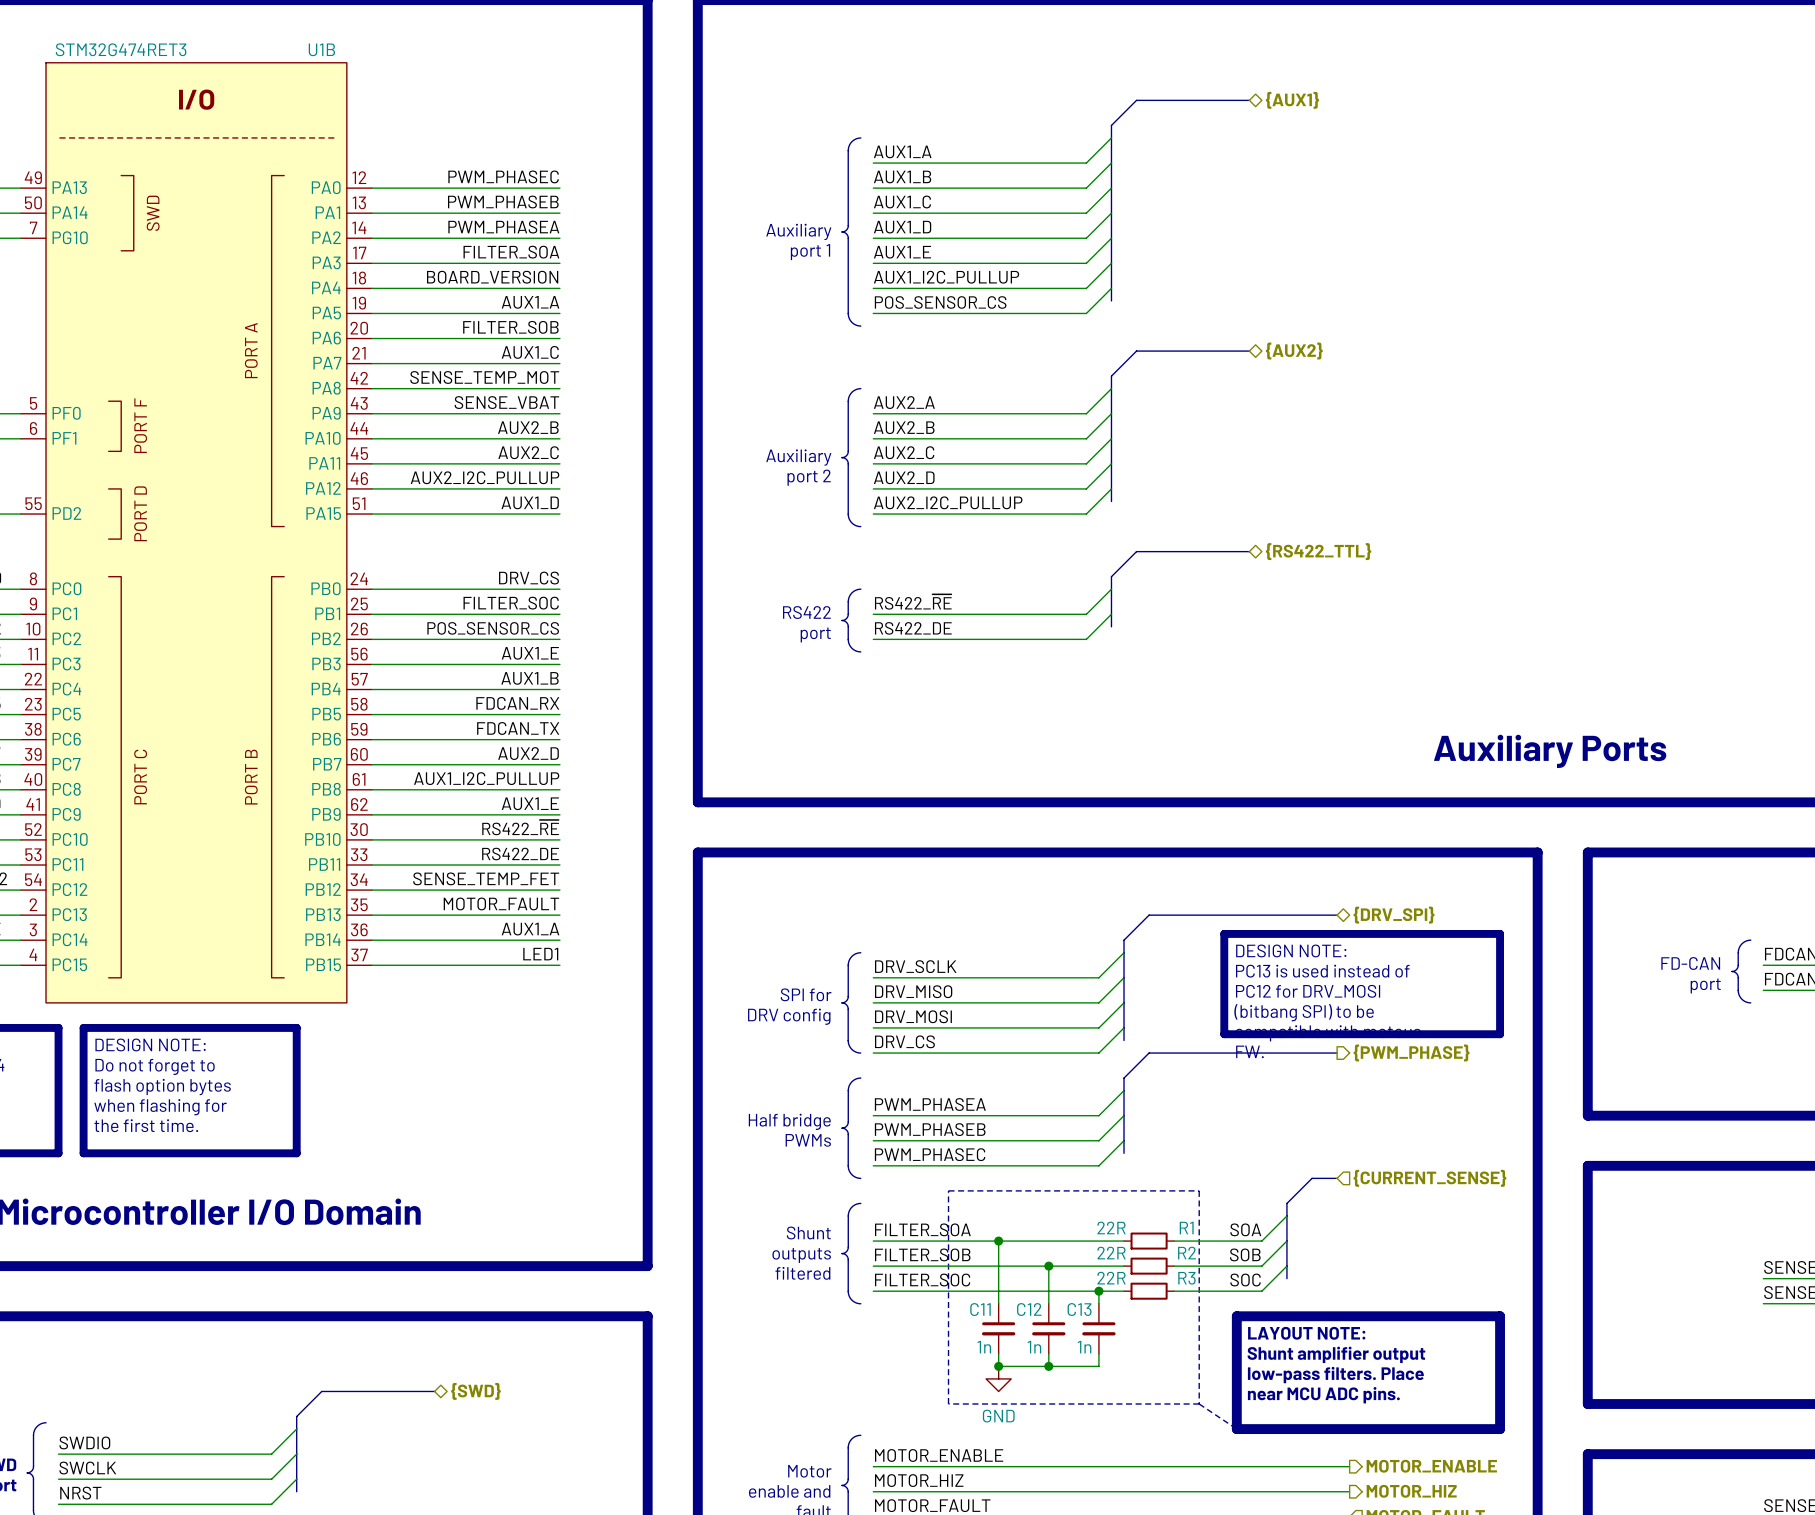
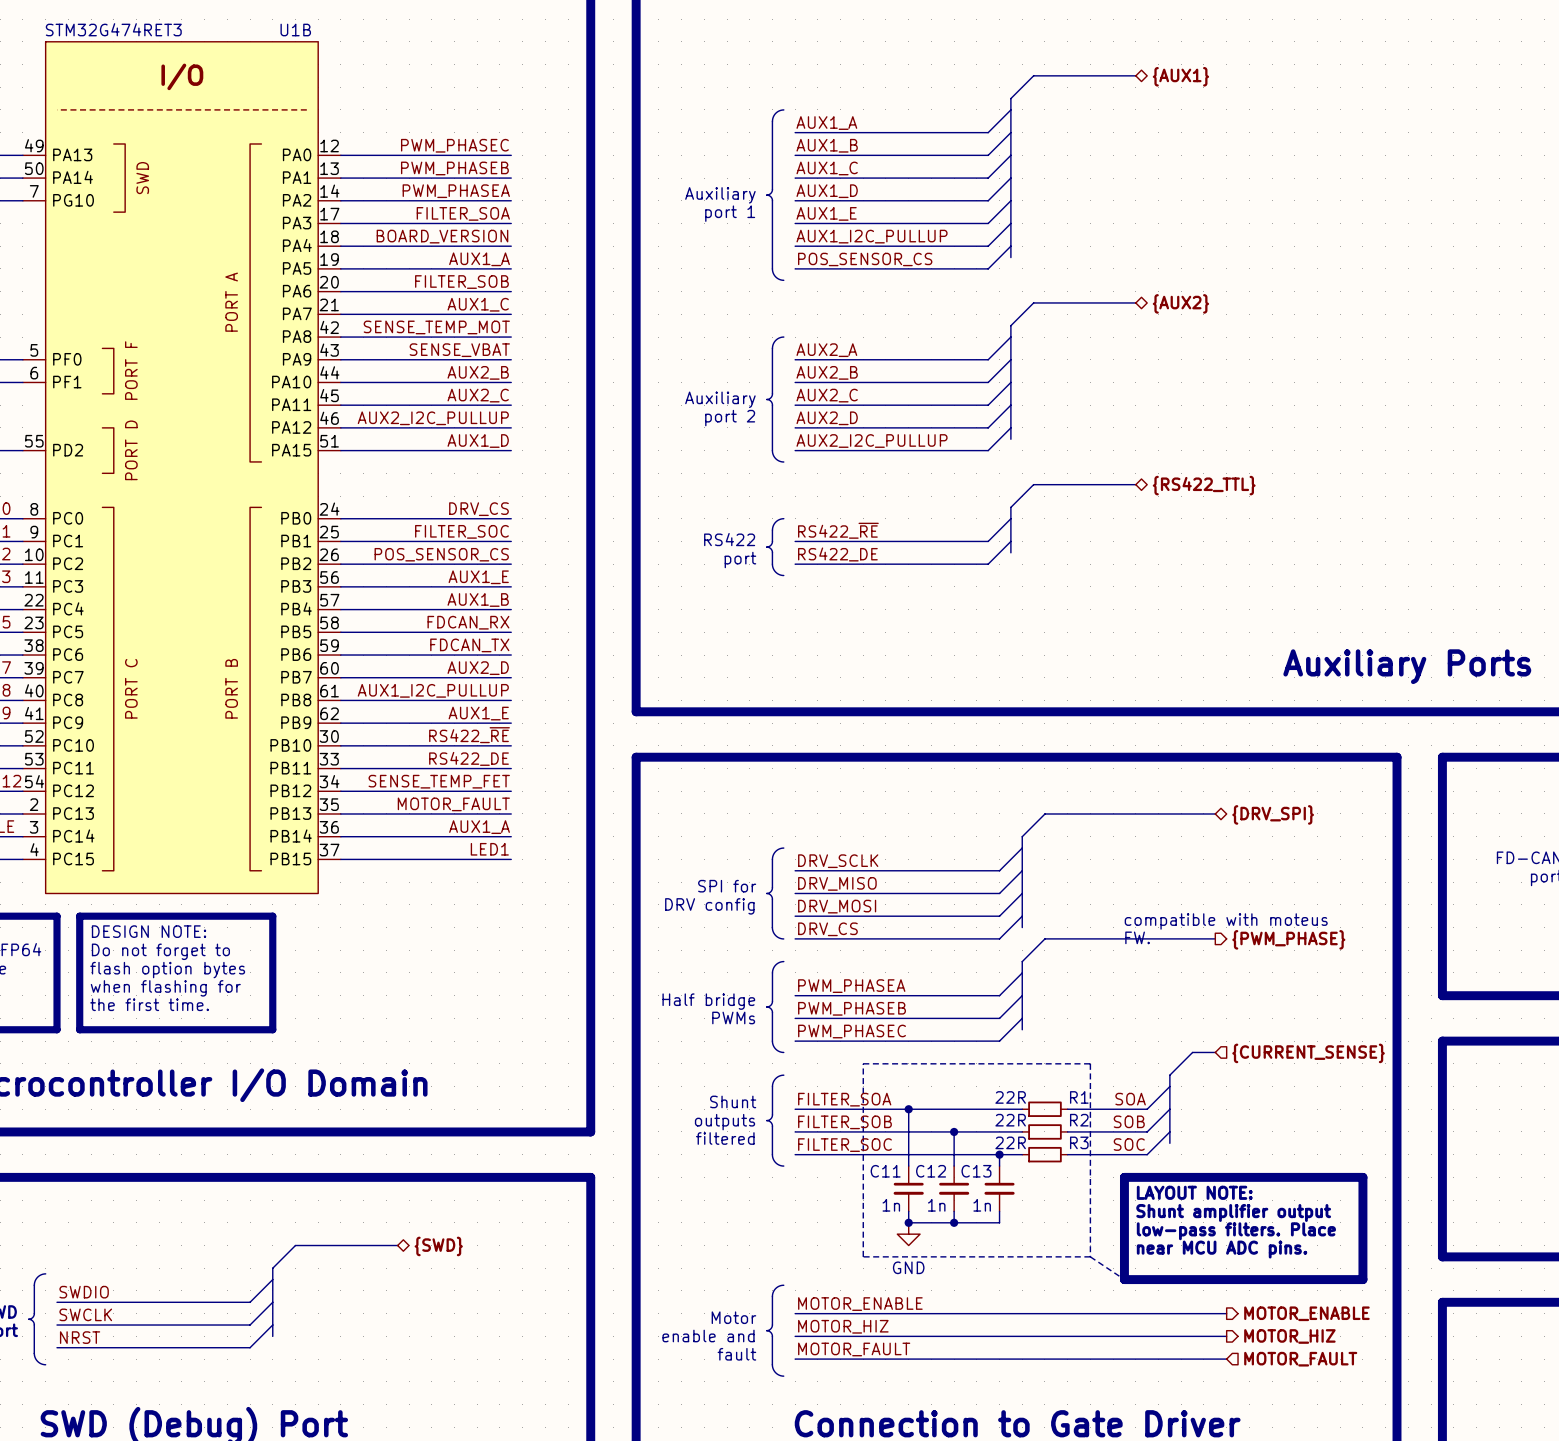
line: (1224, 933) (1500, 933) (1500, 1034) (1224, 1034) (1224, 933) -> none
text: DESIGN NOTE: (1291, 950) -> none
text: PC13 is used instead of (1322, 971) -> none
text: PC12 for DRV_MOSI (1308, 991) -> none
text: (bitbang SPI) to be (1304, 1012) -> none

